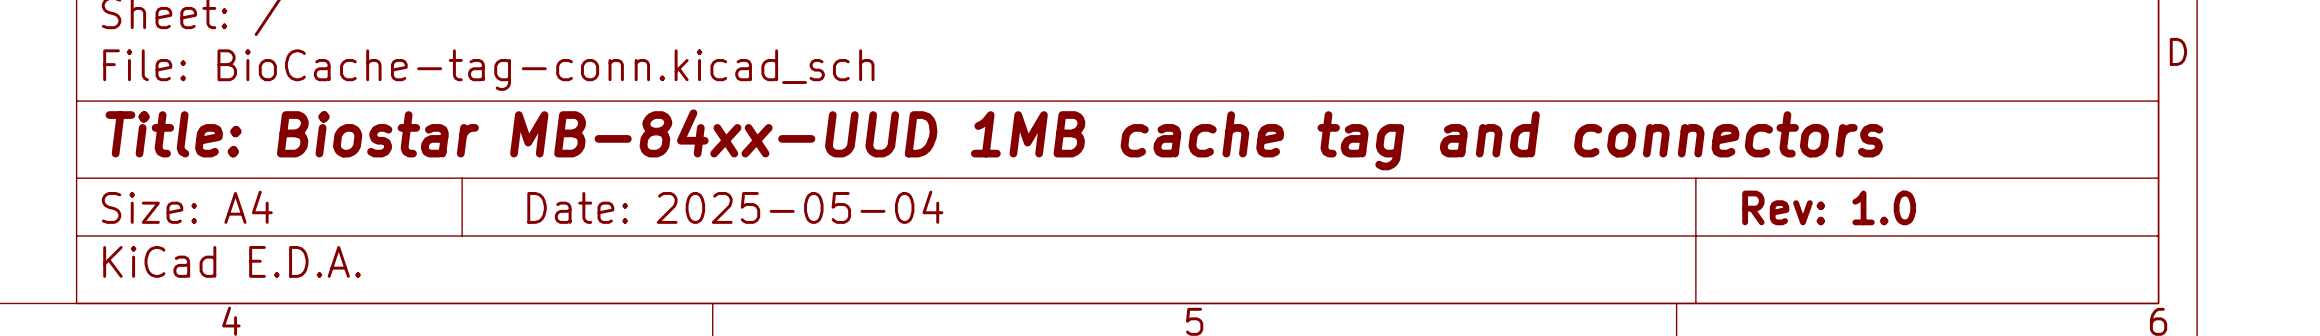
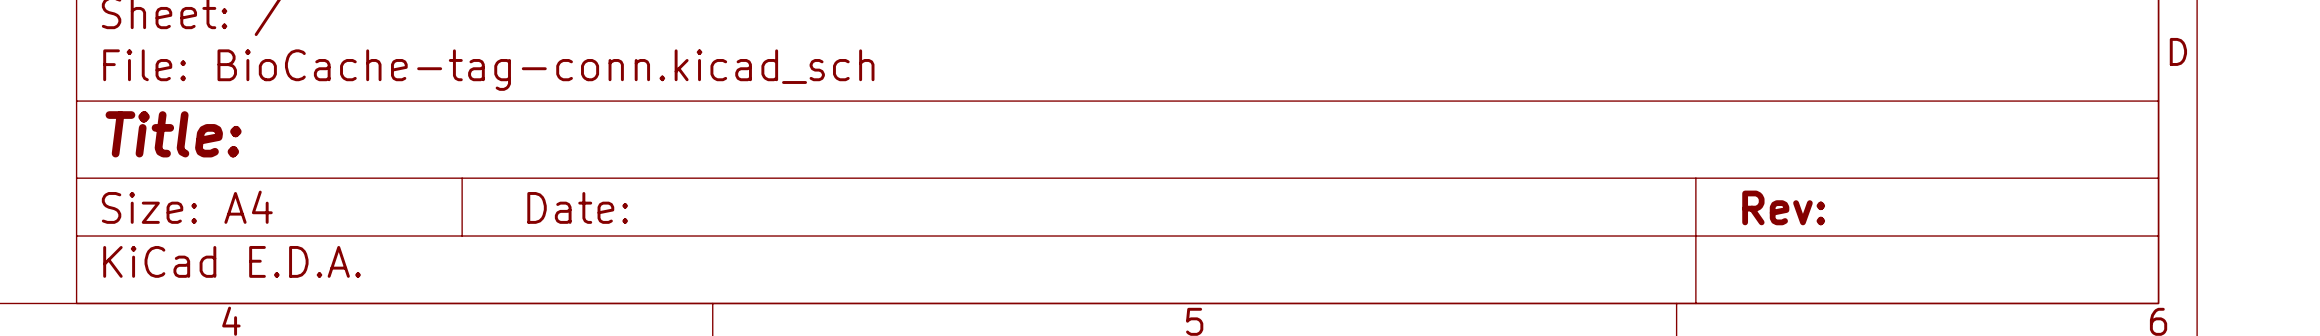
title block: Title: Biostar MB-84xx-UUD 1MB cache tag and connectors (994, 139) -> Title: (173, 134)
title block: Date: 2025-05-04 (735, 207) -> Date: (577, 207)
title block: Rev: 1.0 (1829, 207) -> Rev: (1783, 207)

